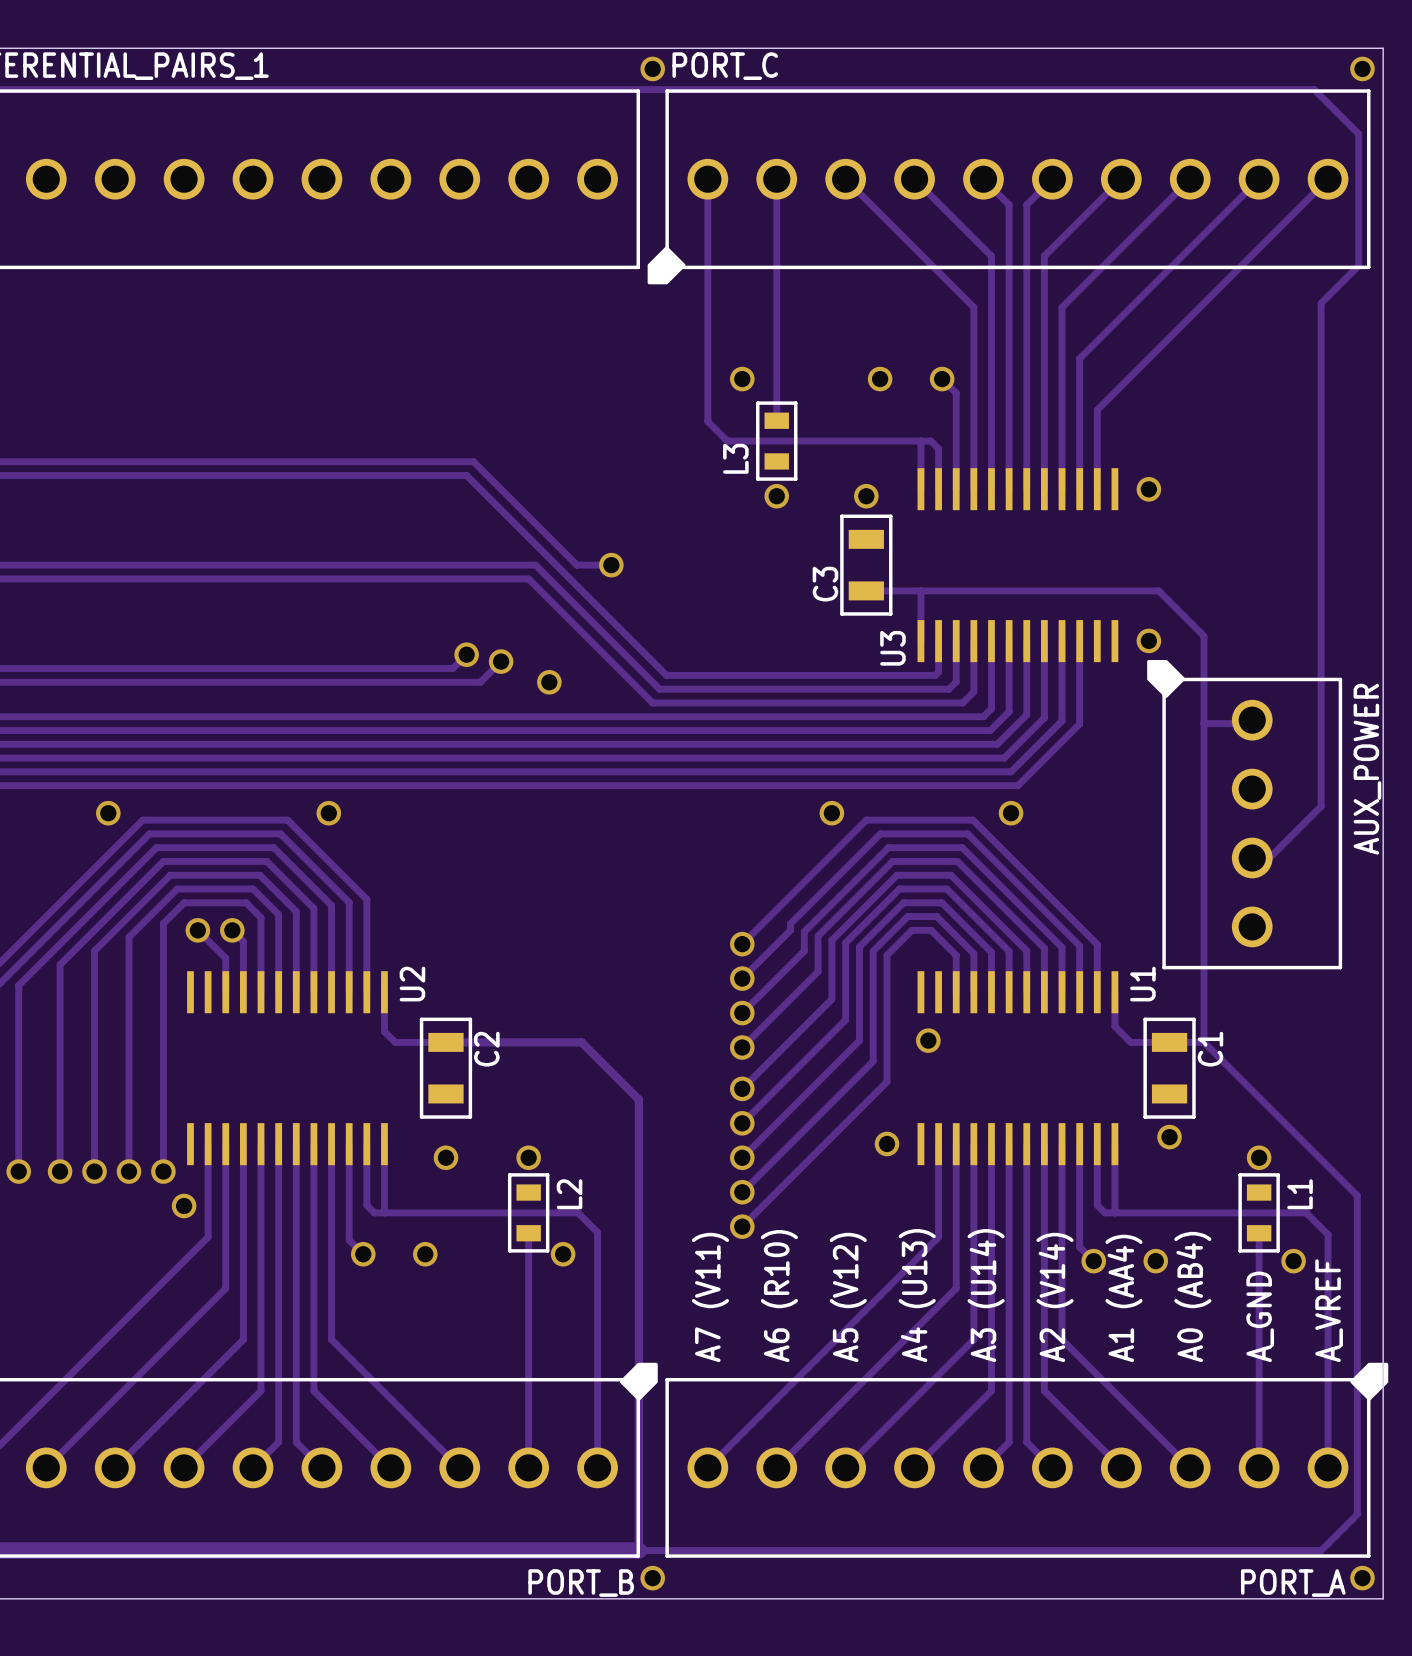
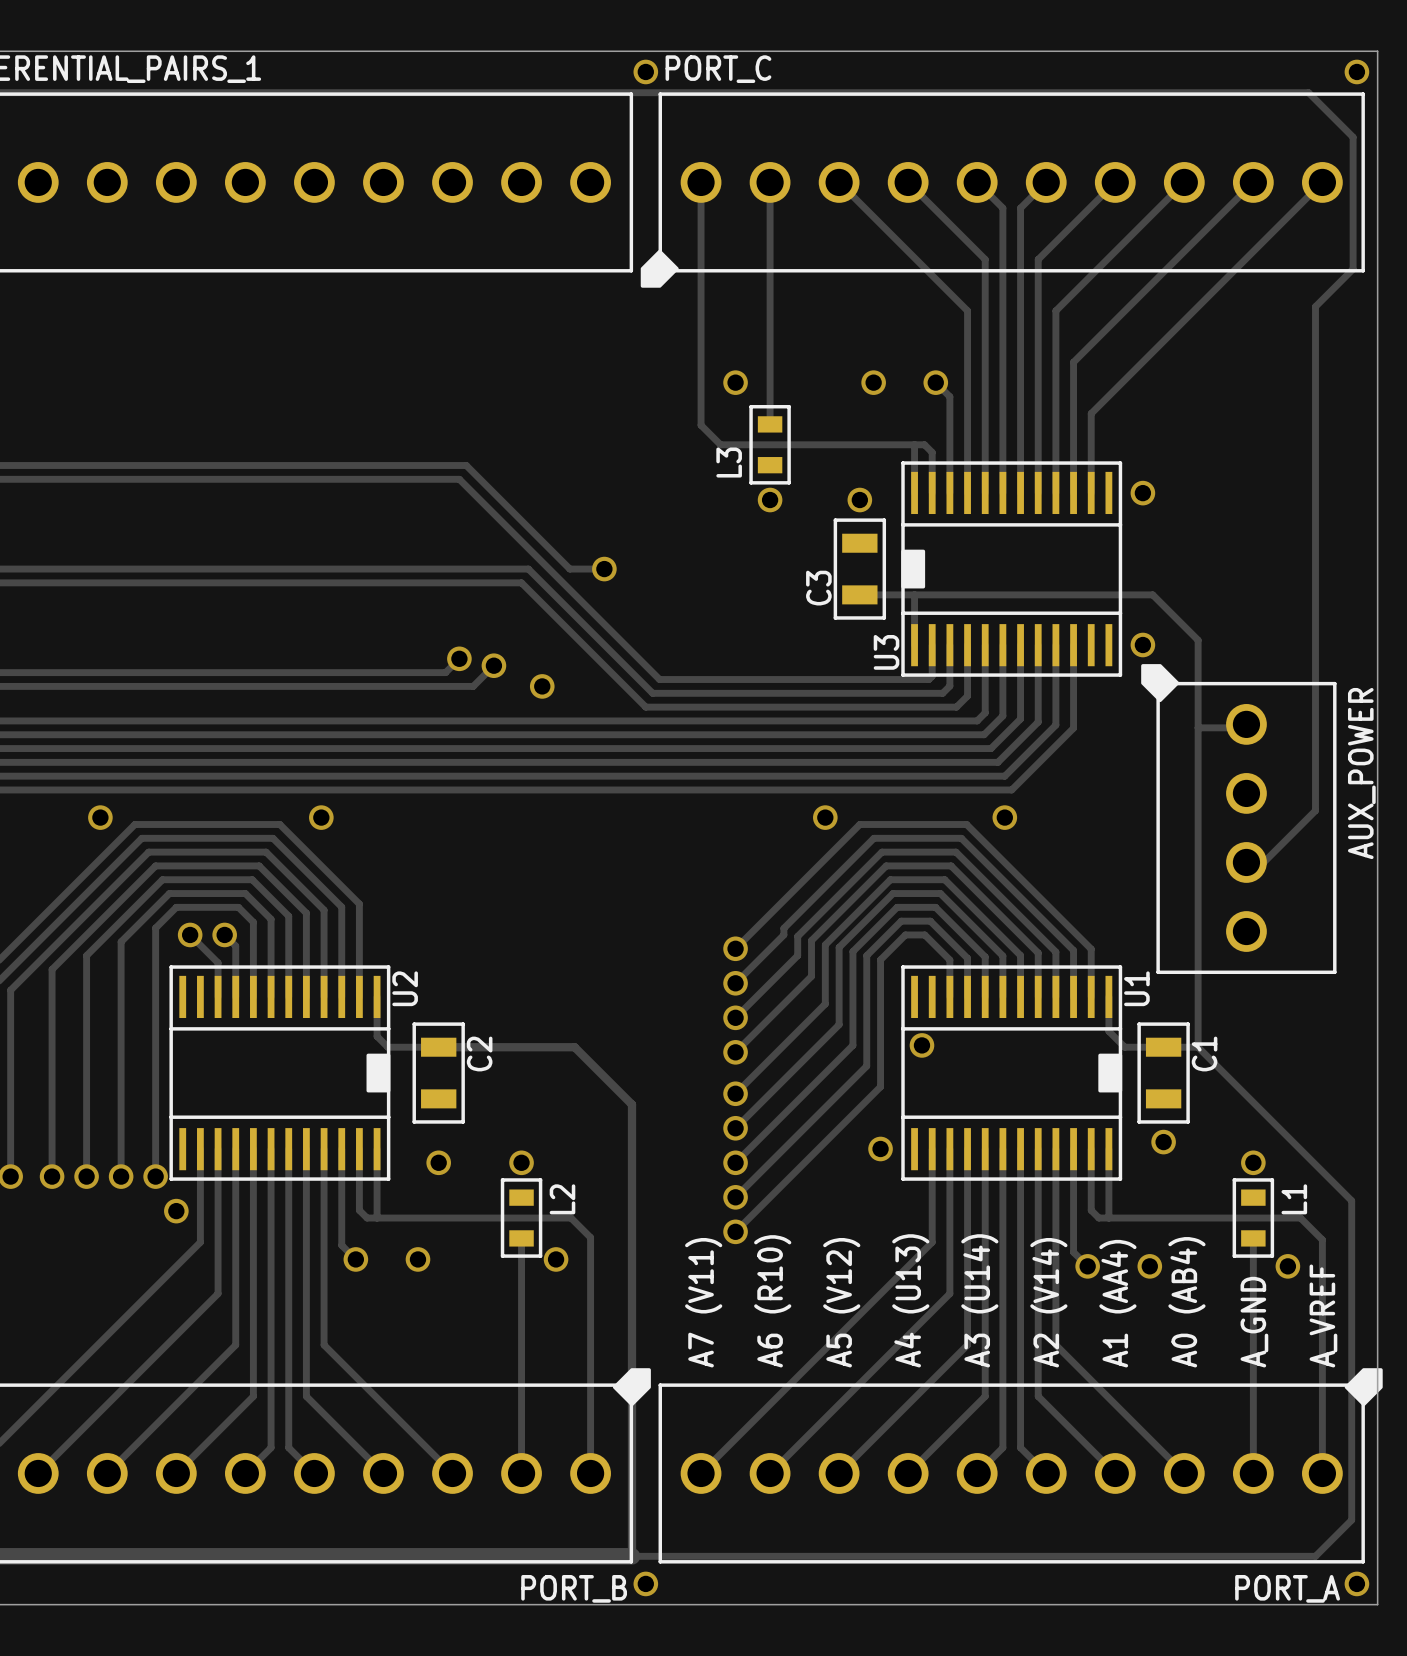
U3 footprint: [917, 468, 1119, 663] -> [901, 461, 1123, 677]
U2 footprint: [187, 971, 388, 1166] -> [169, 965, 391, 1181]
U1 footprint: [917, 971, 1119, 1166] -> [901, 965, 1123, 1181]

